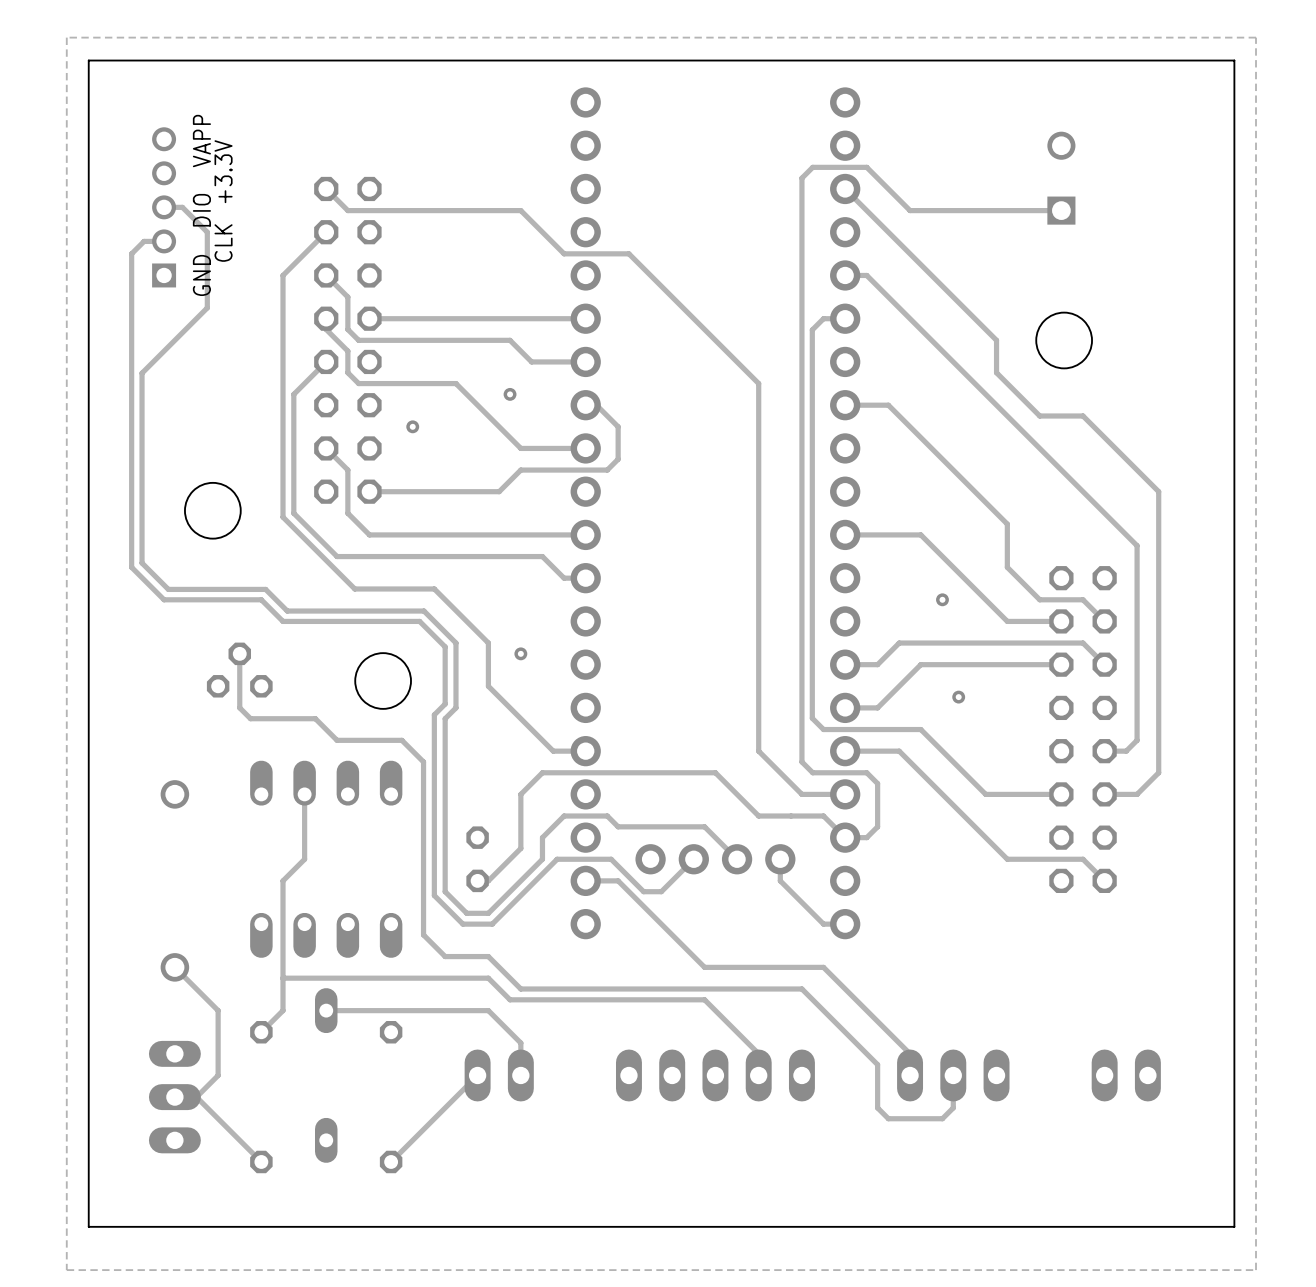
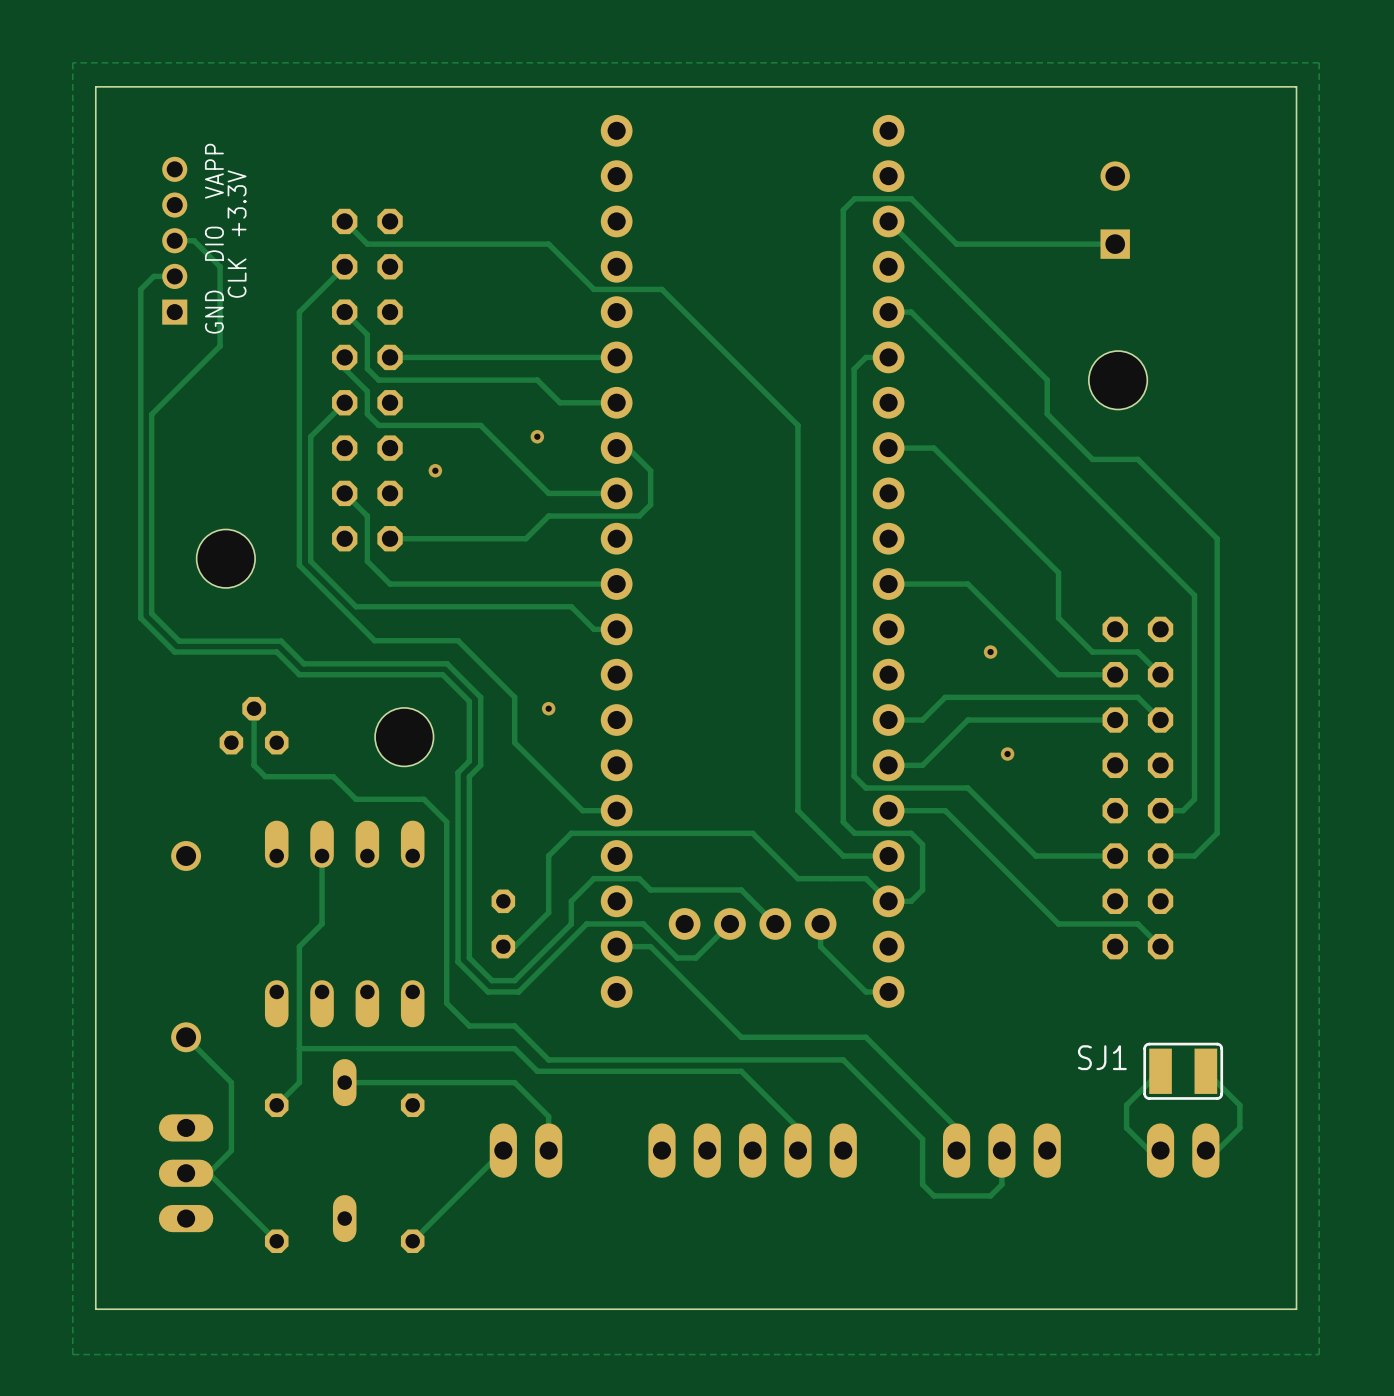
track: none -> (1160, 1071) (1126, 1105) (1126, 1127) (1149, 1150) (1160, 1150)
SJ1: none -> (1183, 1071)
track: none -> (1205, 1071) (1239, 1105) (1239, 1127) (1217, 1150) (1205, 1150)

